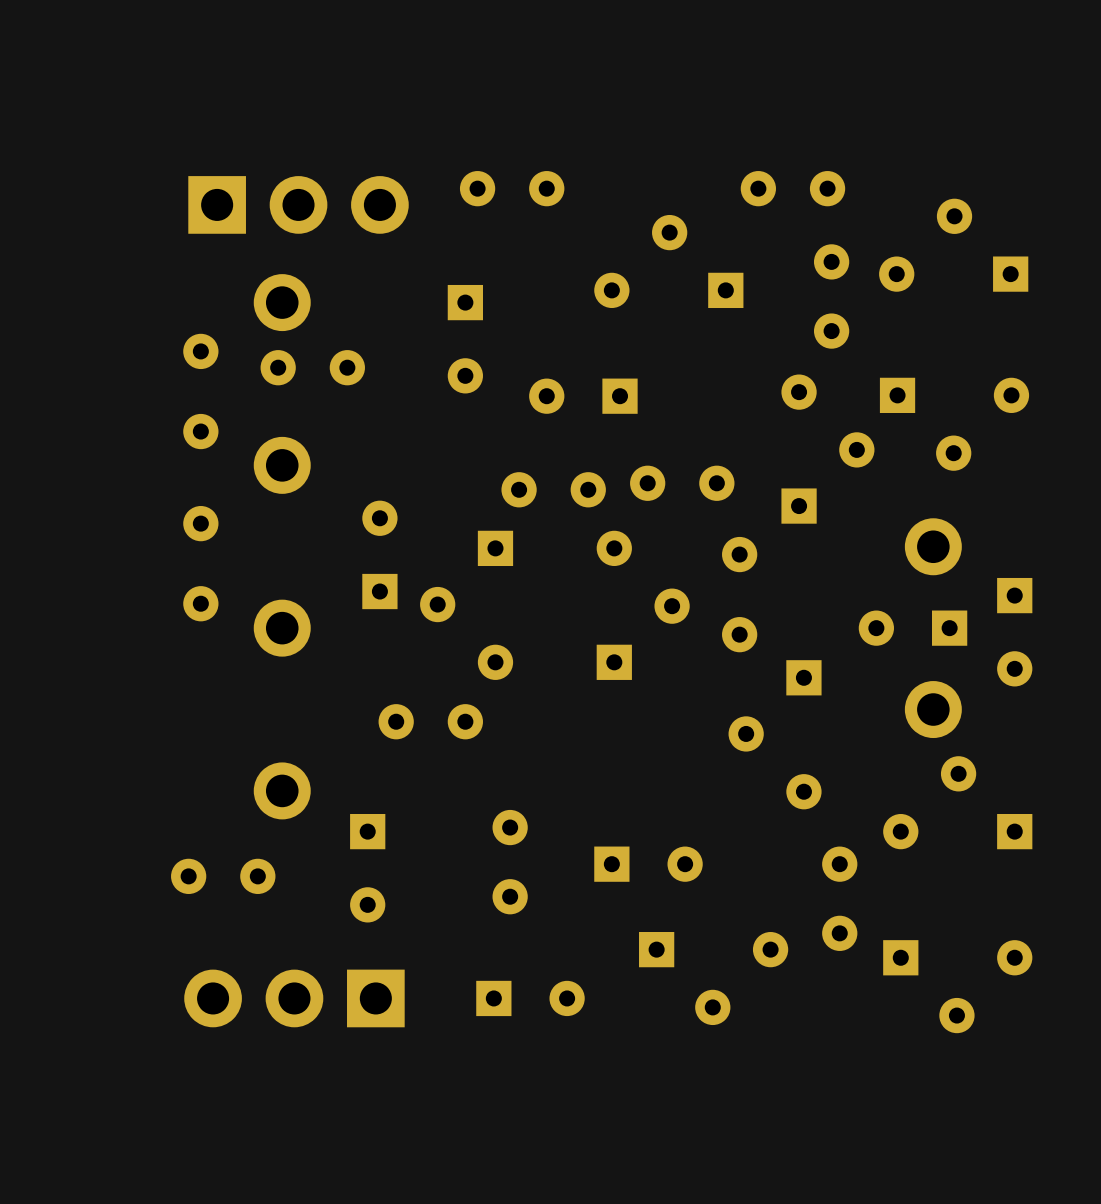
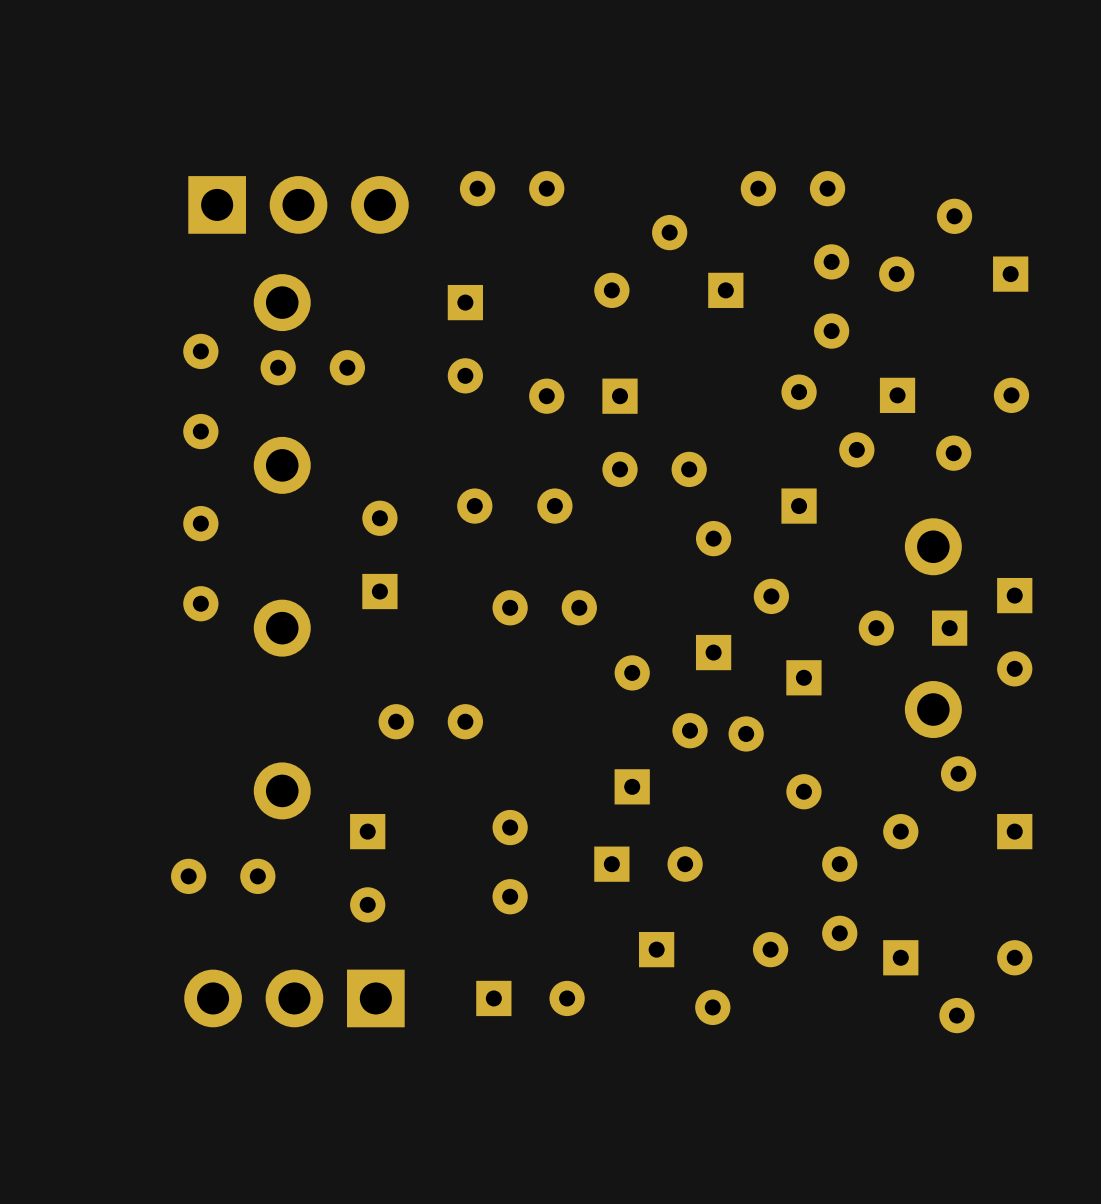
part position: (682, 483) -> (654, 469)
part position: (553, 489) -> (544, 607)
part: none -> (514, 506)
part footprint: [722, 536, 758, 653] -> [695, 520, 790, 671]
part: (466, 605) -> none
part: (643, 605) -> none
part: none -> (661, 729)

